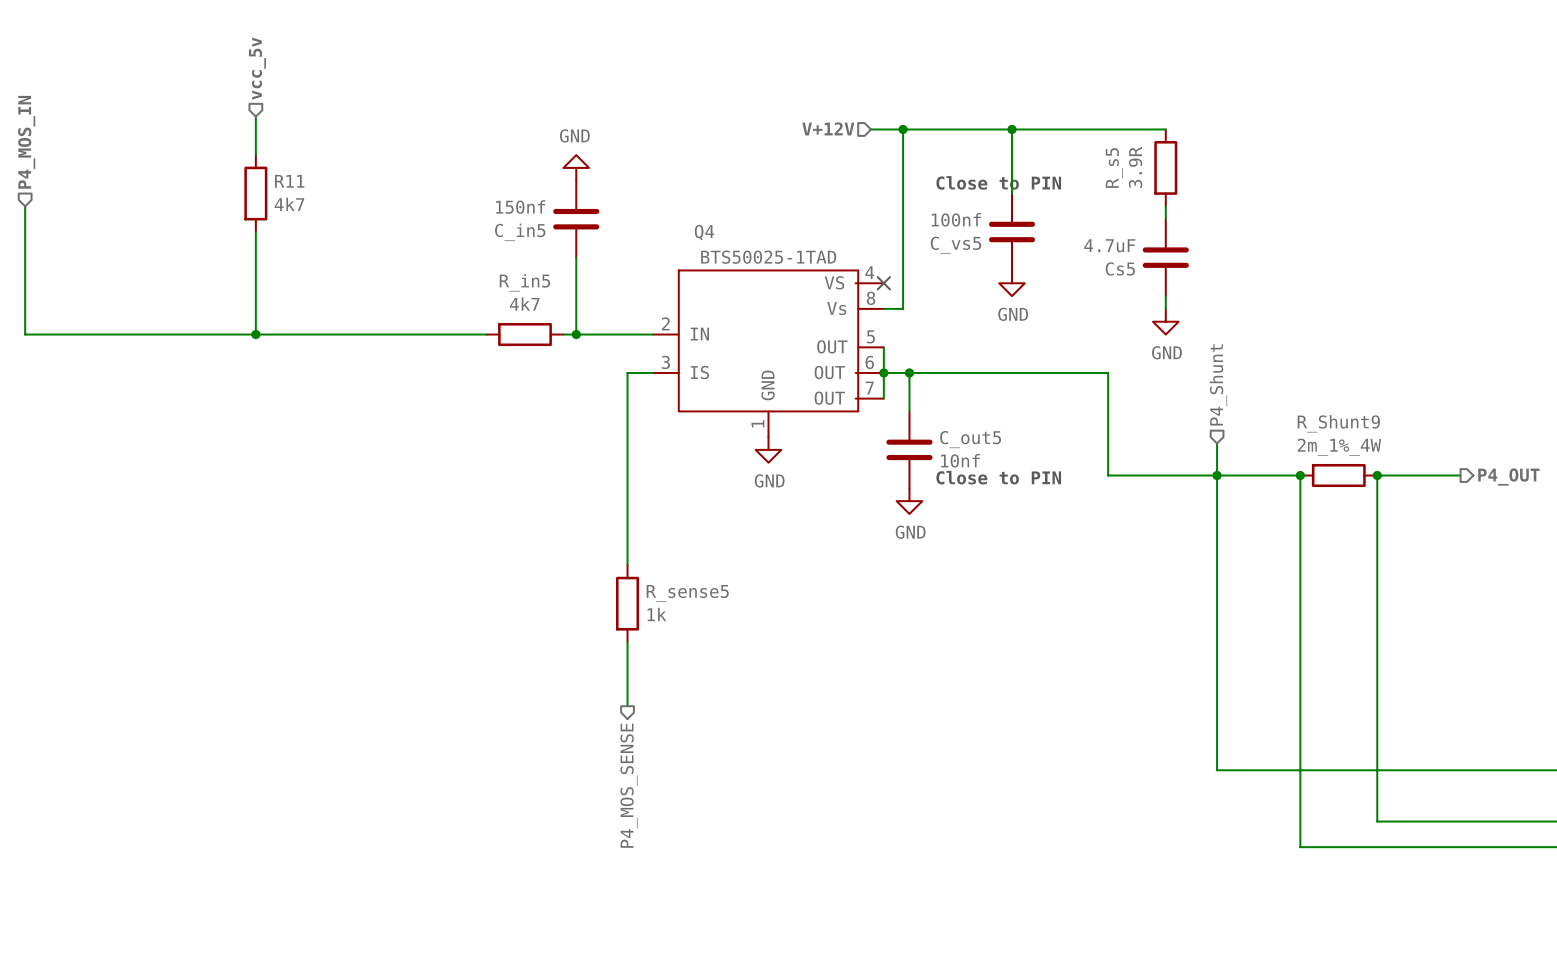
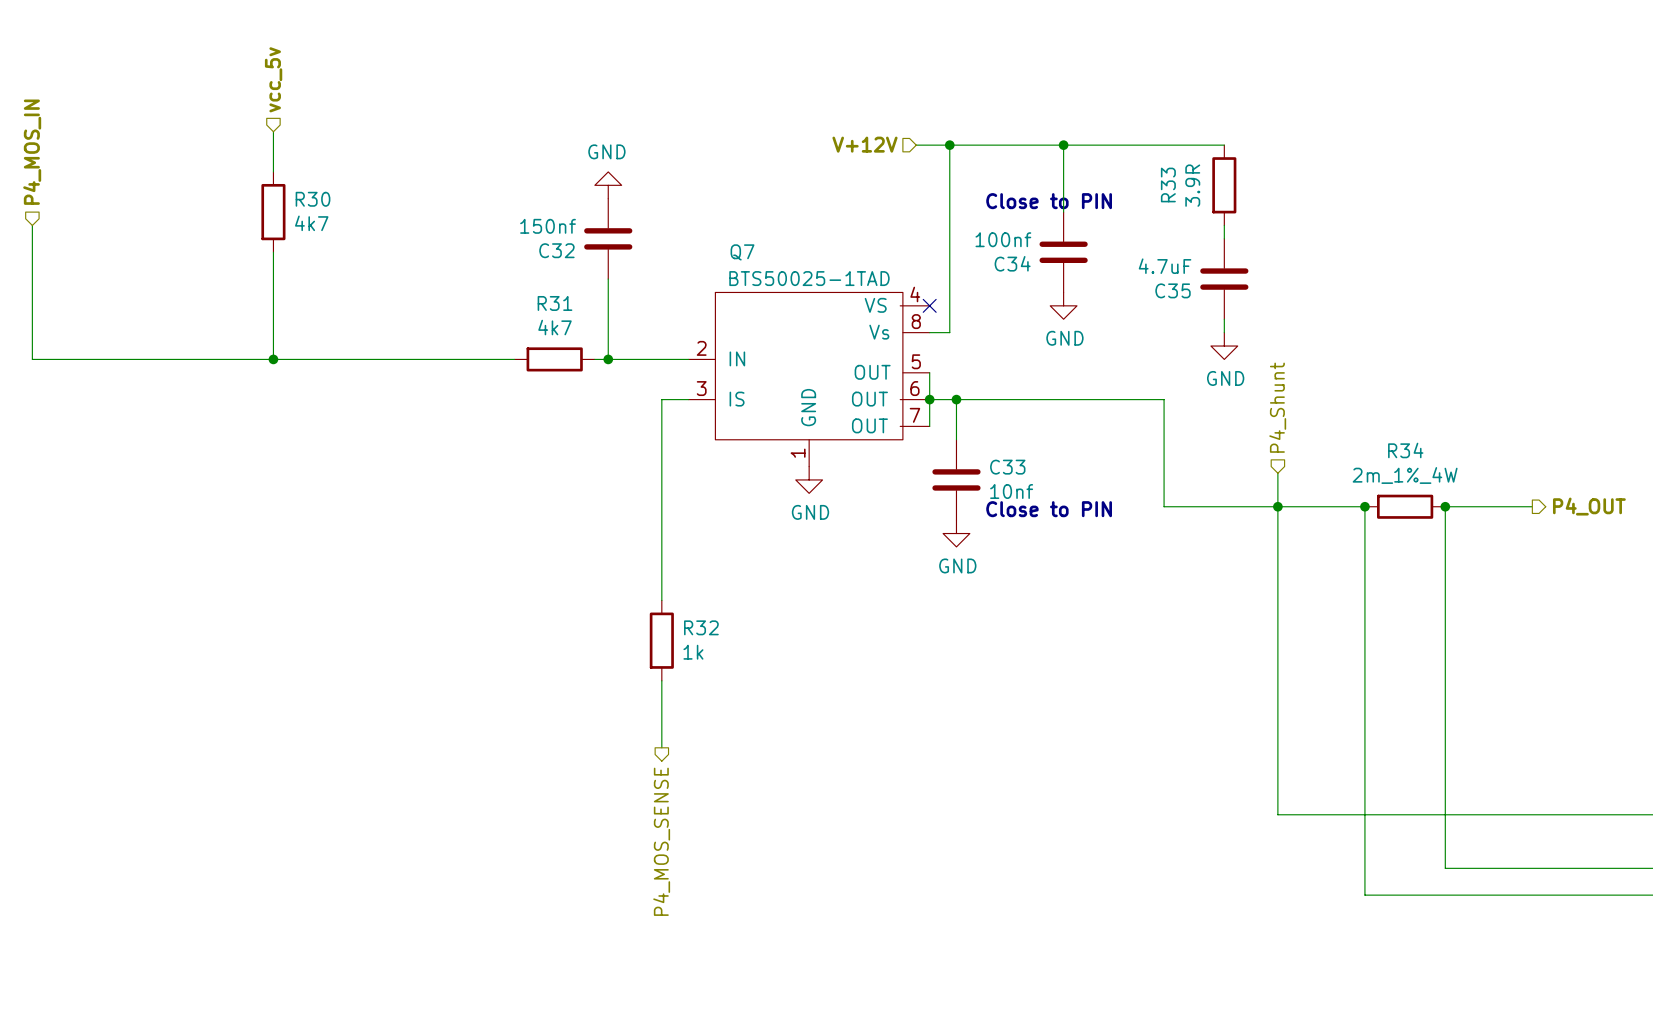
R_s5 name: R_s5 (1114, 168) -> R33 (1168, 185)
R11 name: R11 (289, 181) -> R30 (313, 199)
C_in5 name: C_in5 (520, 232) -> C32 (556, 250)
Q4 name: Q4 (704, 232) -> Q7 (742, 252)
C_vs5 name: C_vs5 (955, 245) -> C34 (1012, 263)
Cs5 name: Cs5 (1120, 268) -> C35 (1173, 290)
R_in5 name: R_in5 (524, 282) -> R31 (555, 303)
R_Shunt9 name: R_Shunt9 (1338, 423) -> R34 (1405, 450)
C_out5 name: C_out5 (970, 439) -> C33 (1007, 467)
R_sense5 name: R_sense5 (687, 593) -> R32 (701, 627)

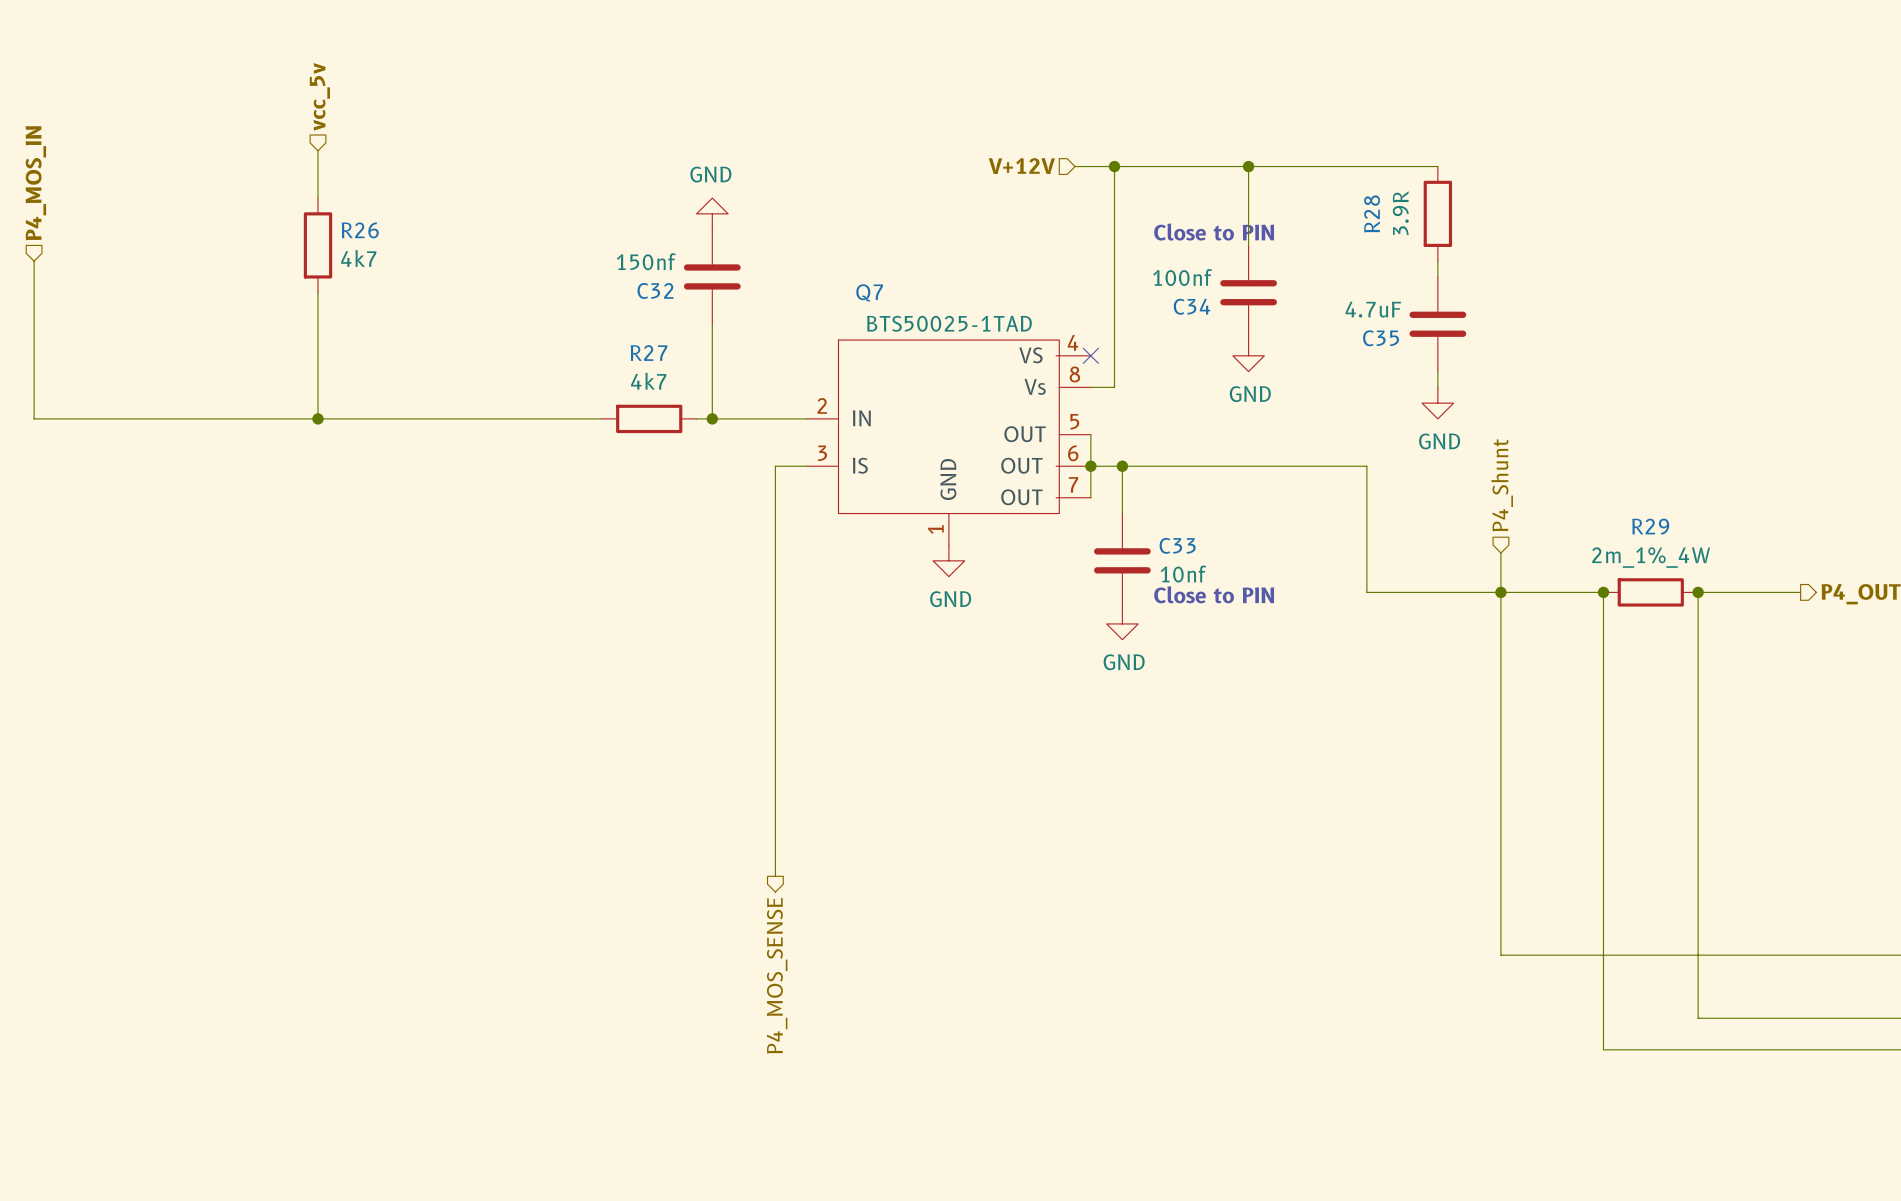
R33 name: R33 (1168, 185) -> R28 (1372, 213)
R30 name: R30 (313, 199) -> R26 (360, 230)
R31 name: R31 (555, 303) -> R27 (648, 353)
R34 name: R34 (1405, 450) -> R29 (1650, 526)
wire: none -> (775, 702) (775, 797)
R32: 1k (661, 640) -> none

